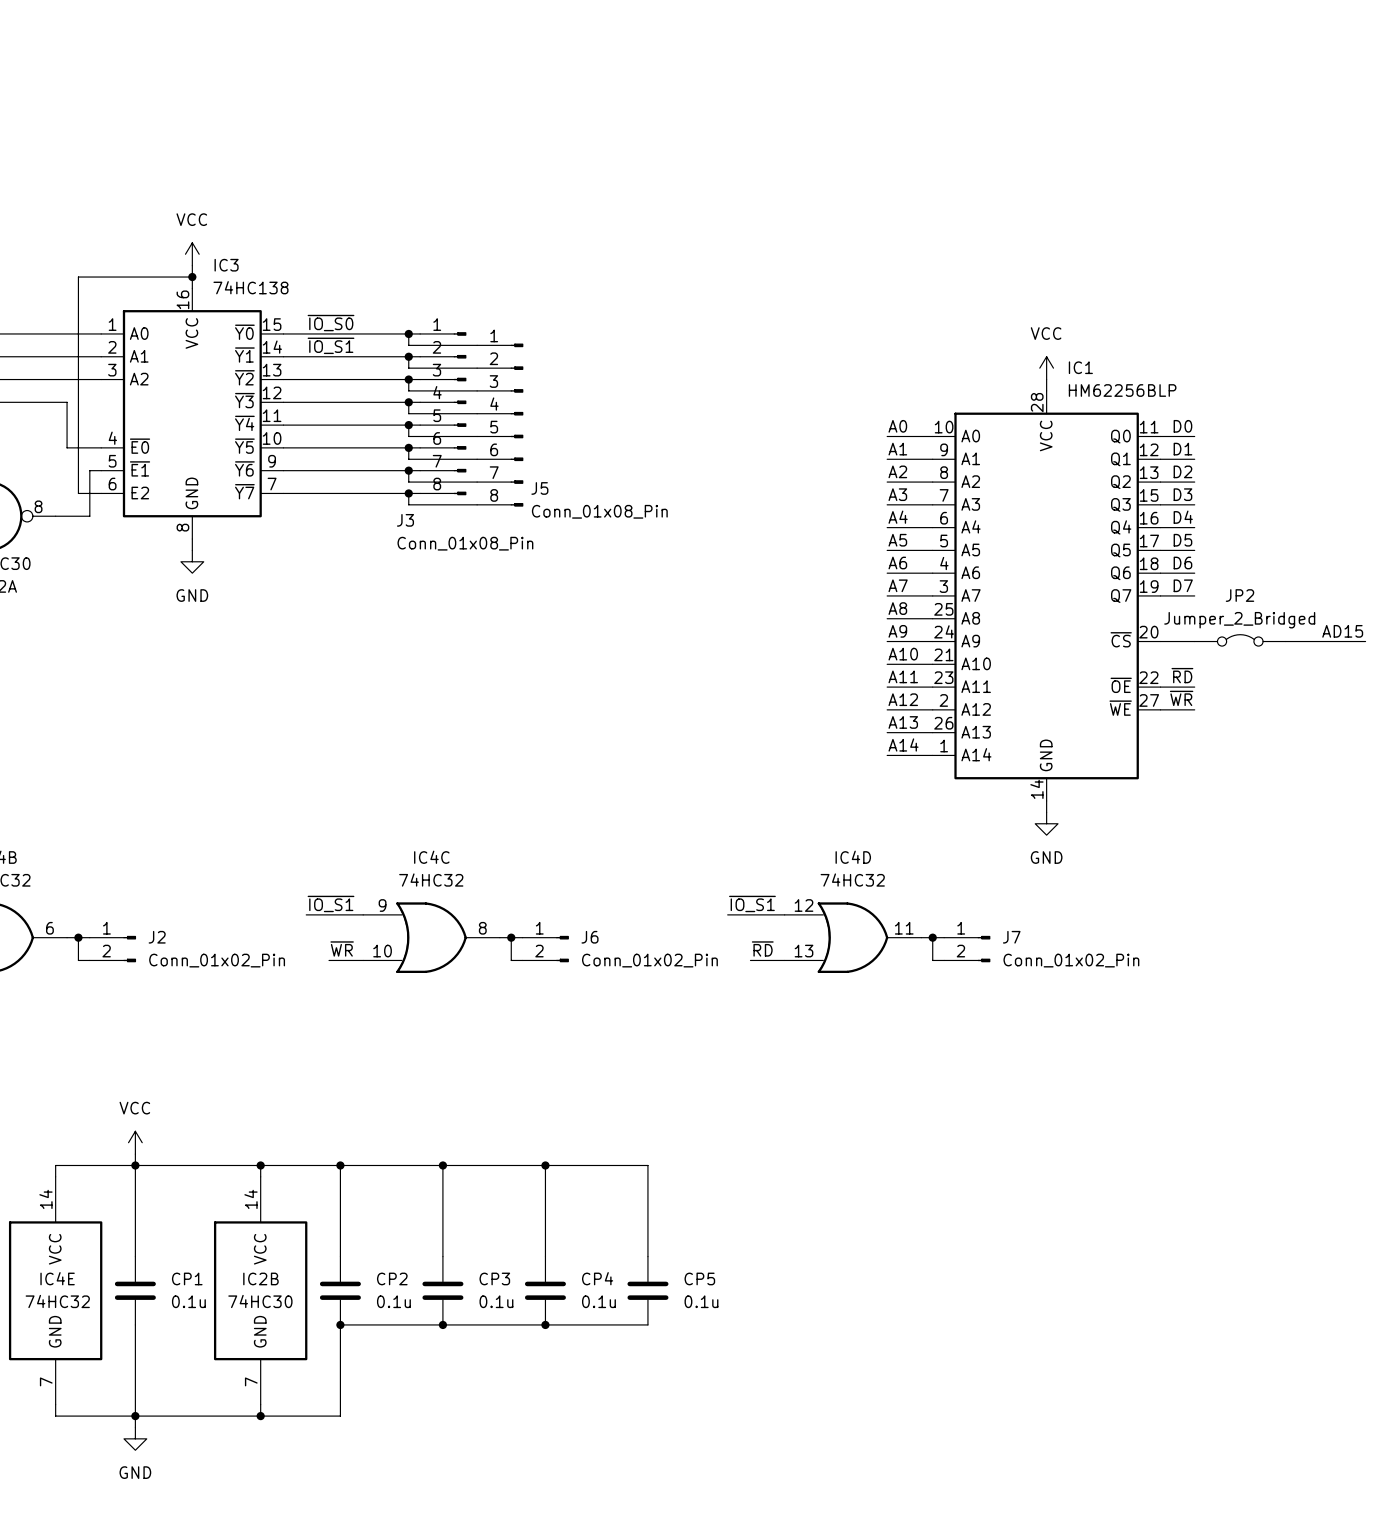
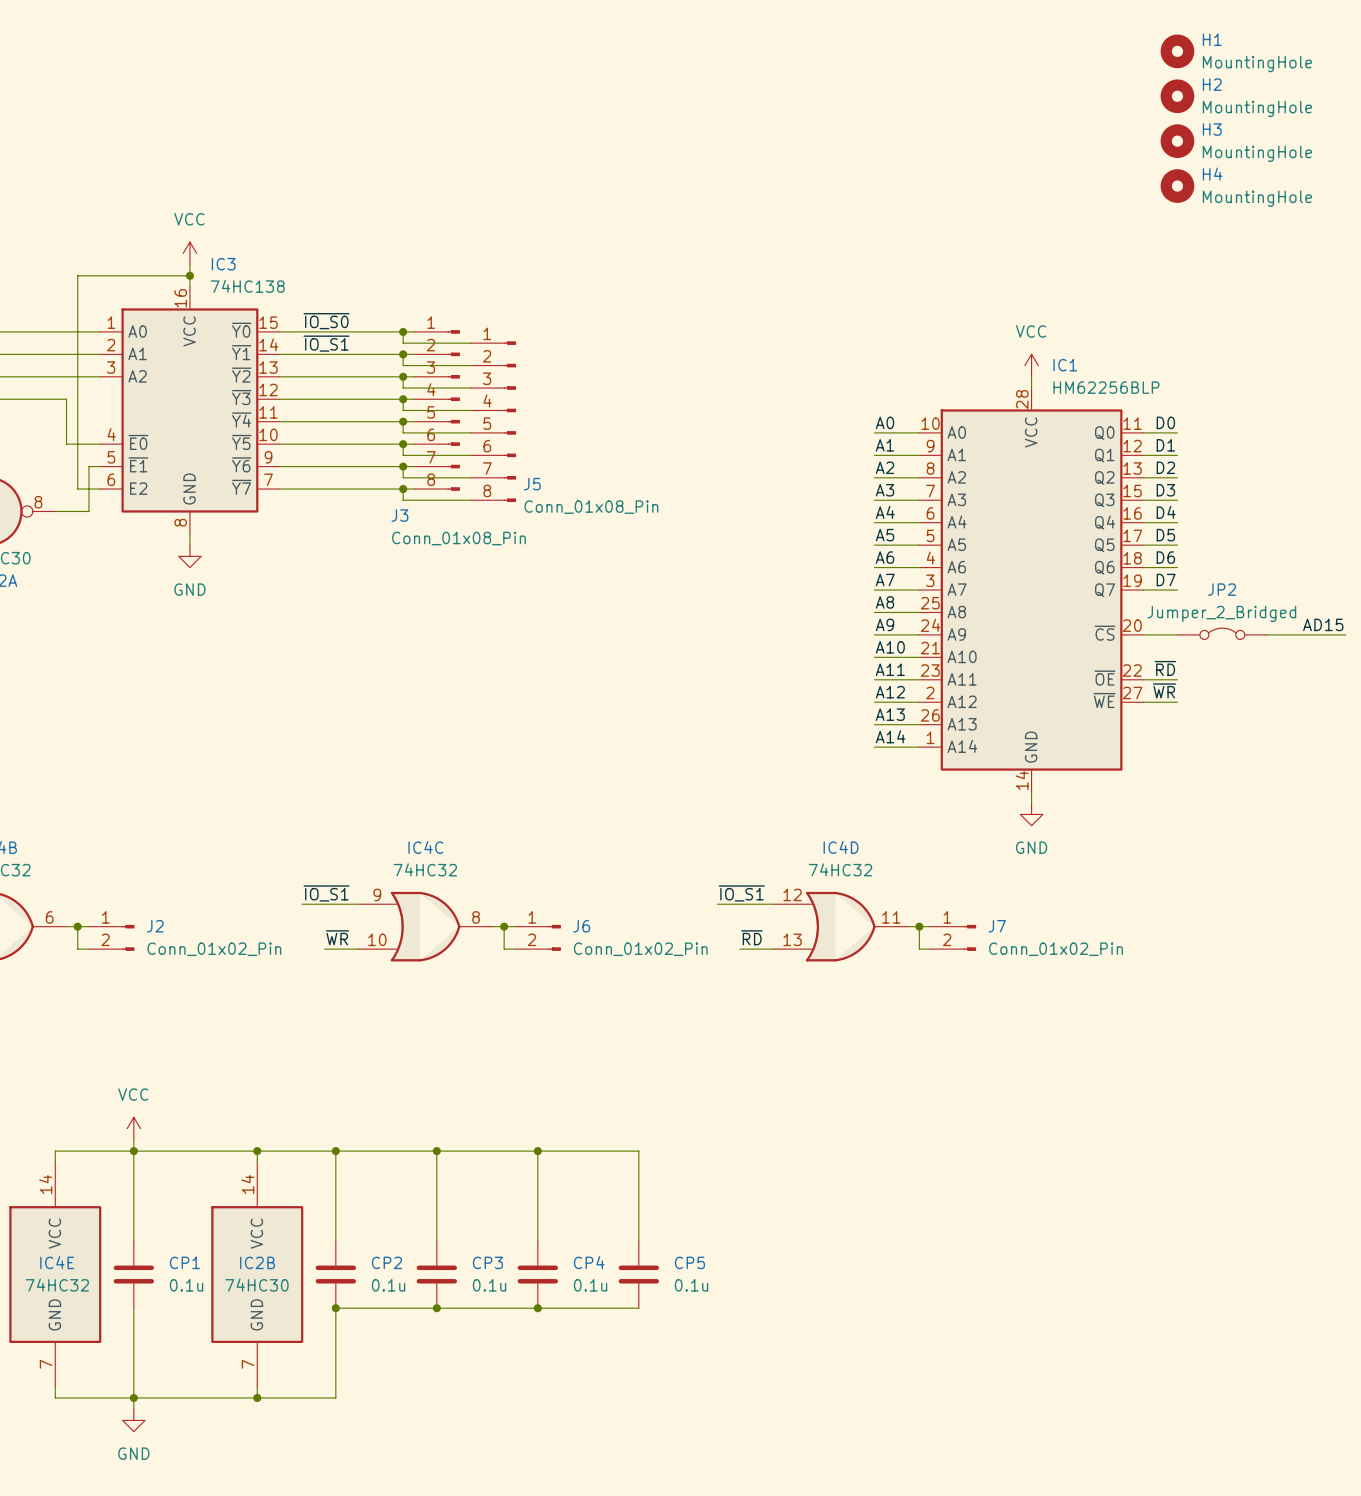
H1: none -> MountingHole (1177, 51)
H2: none -> MountingHole (1177, 96)
H3: none -> MountingHole (1177, 141)
H4: none -> MountingHole (1177, 186)

